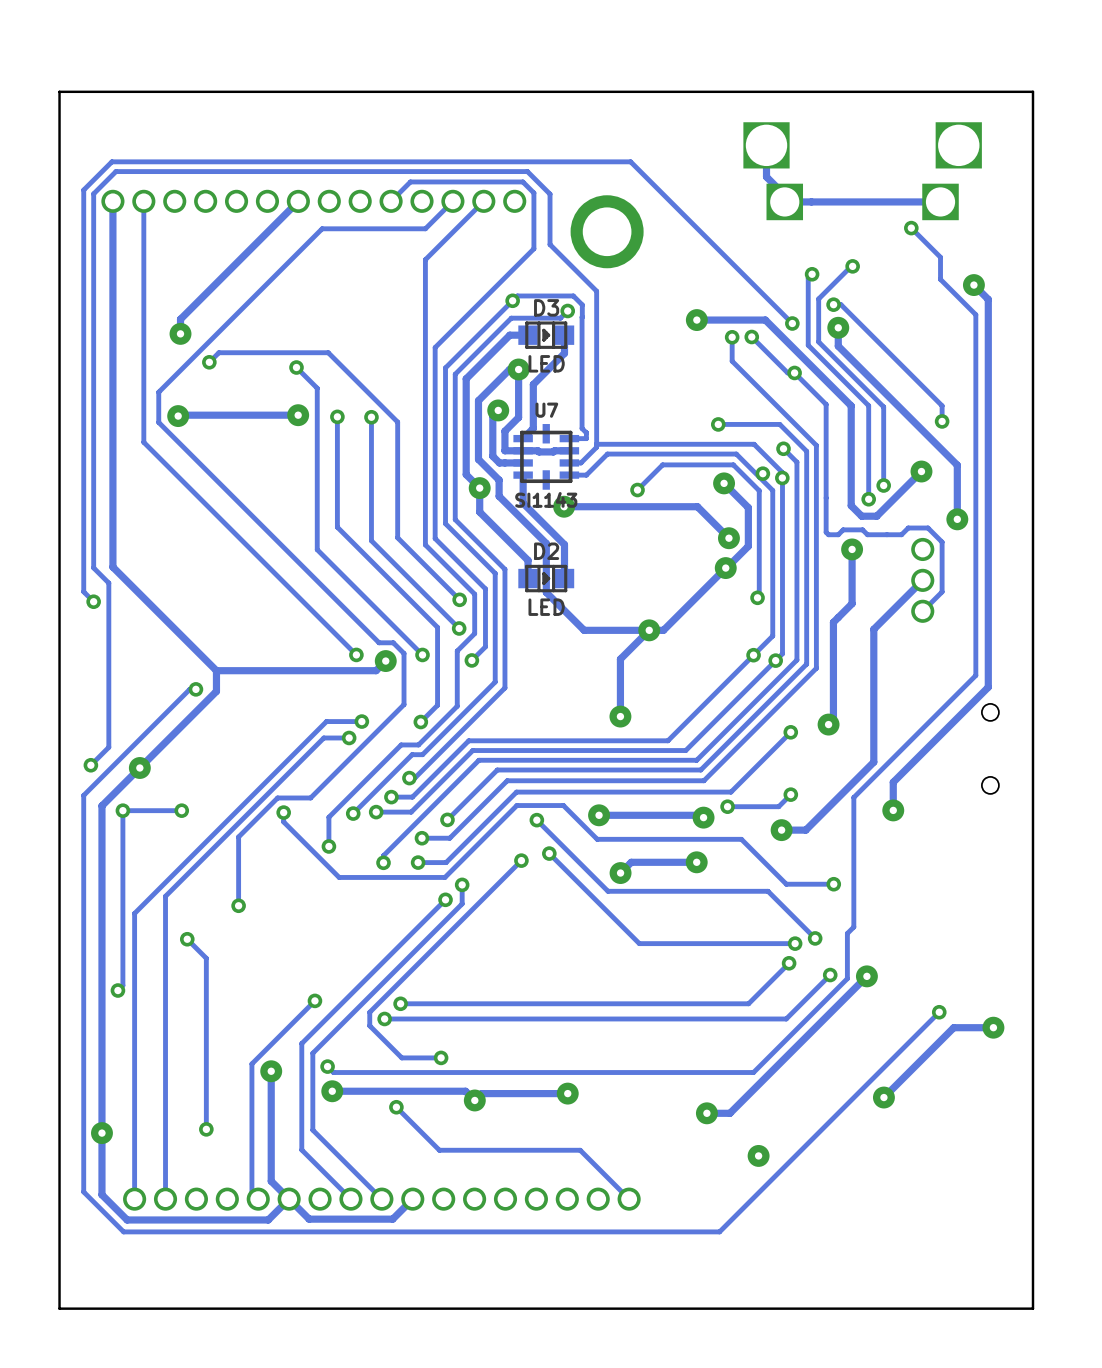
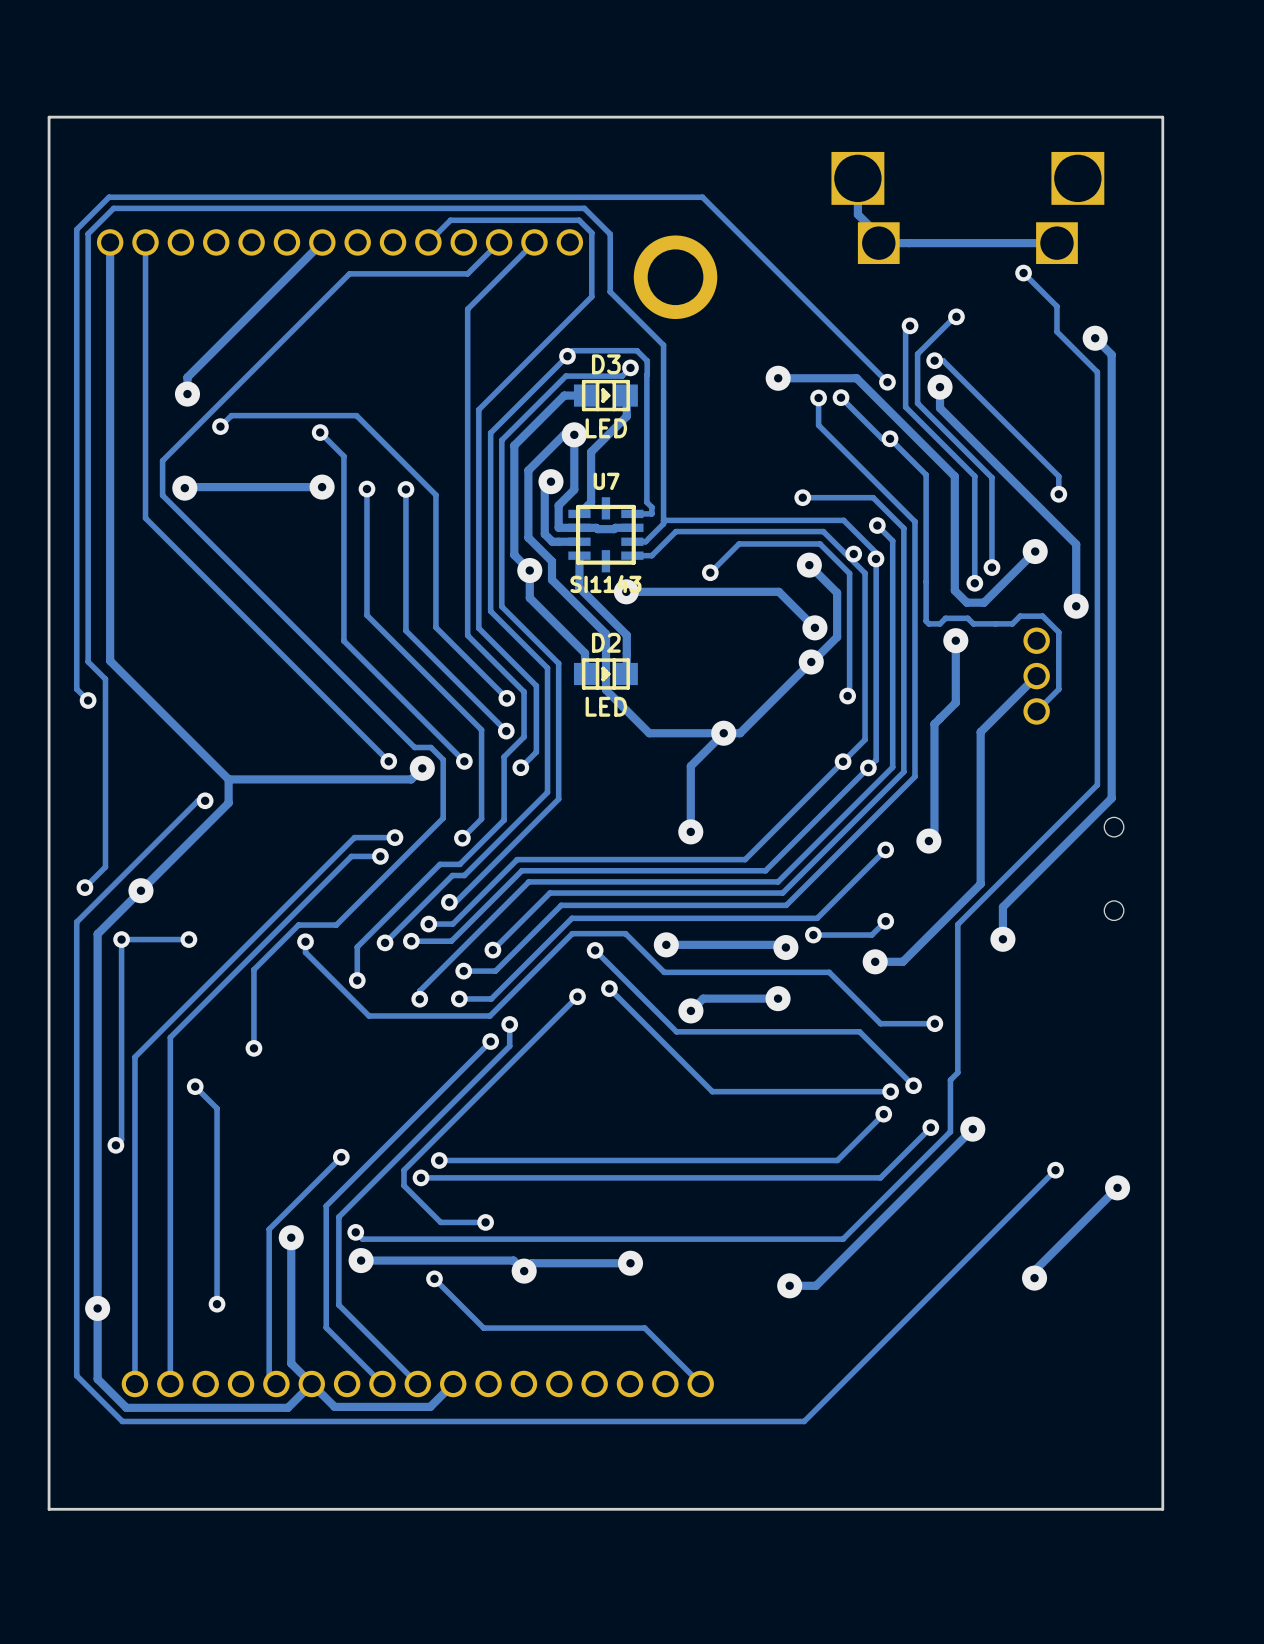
track: (993, 1027) (953, 1027) (883, 1097) -> (1117, 1187) (1034, 1270) (1034, 1278)
via position: (883, 1097) -> (1034, 1278)
via: (758, 1155) -> none

